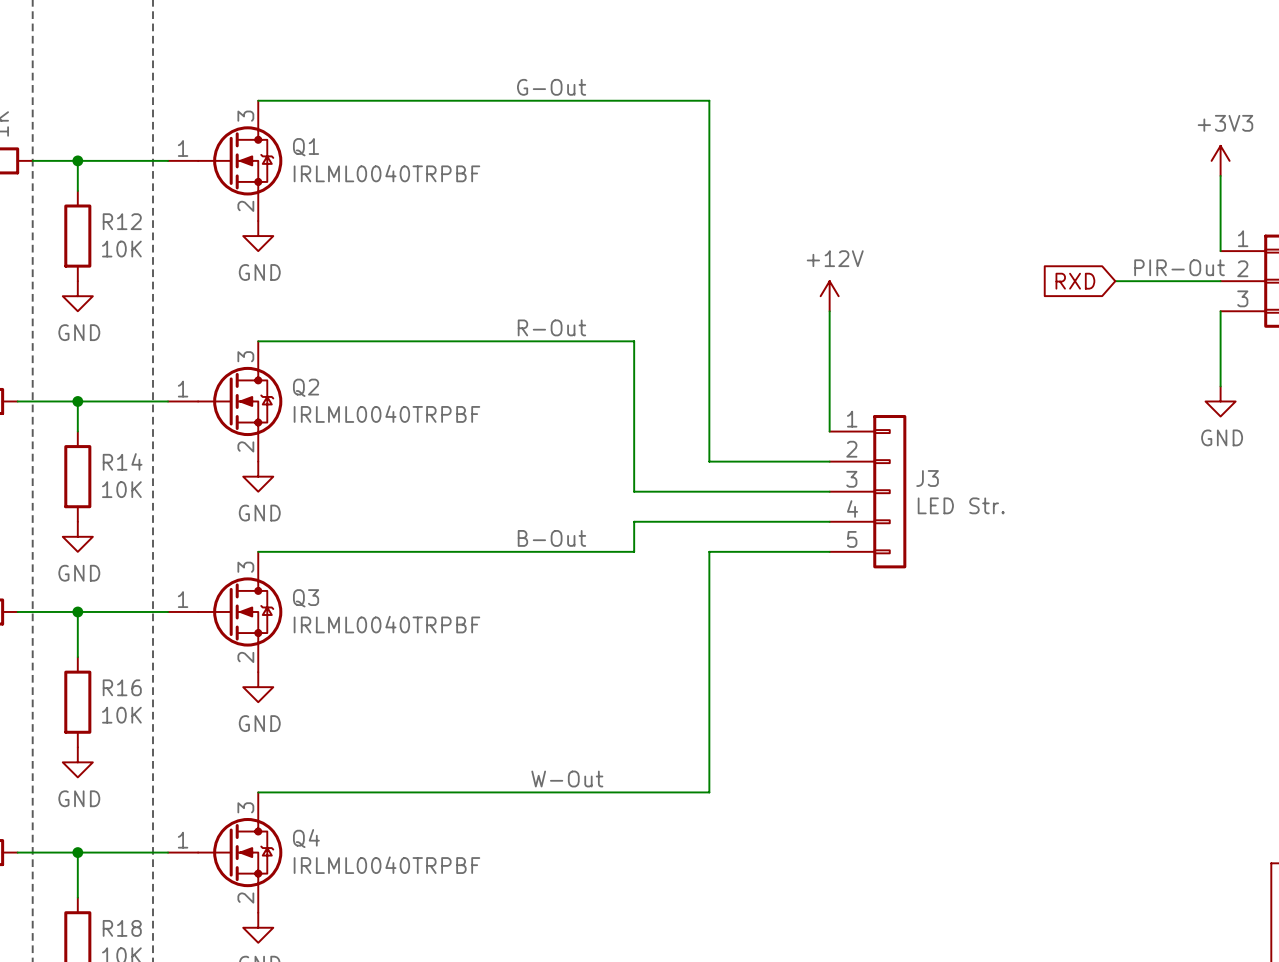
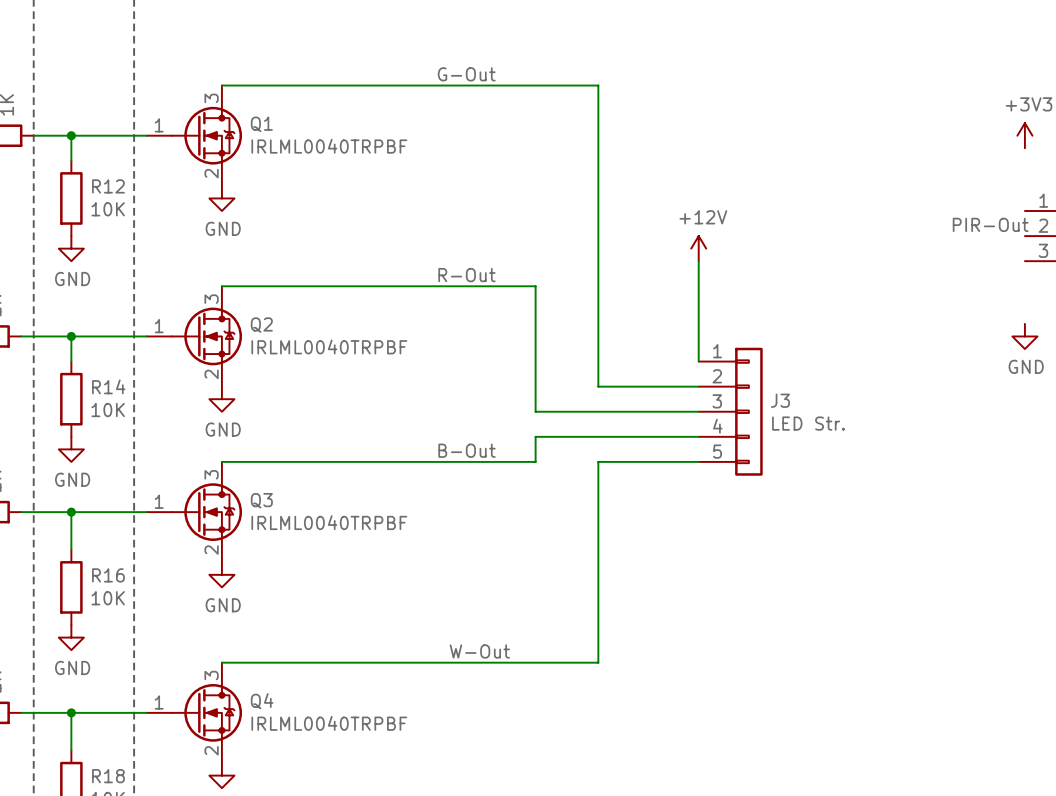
wire: (1220, 175) (1220, 251) -> none
global label: RXD (1075, 281) -> none
wire: (1115, 281) (1220, 281) -> none
wire: (1220, 311) (1220, 386) -> none

